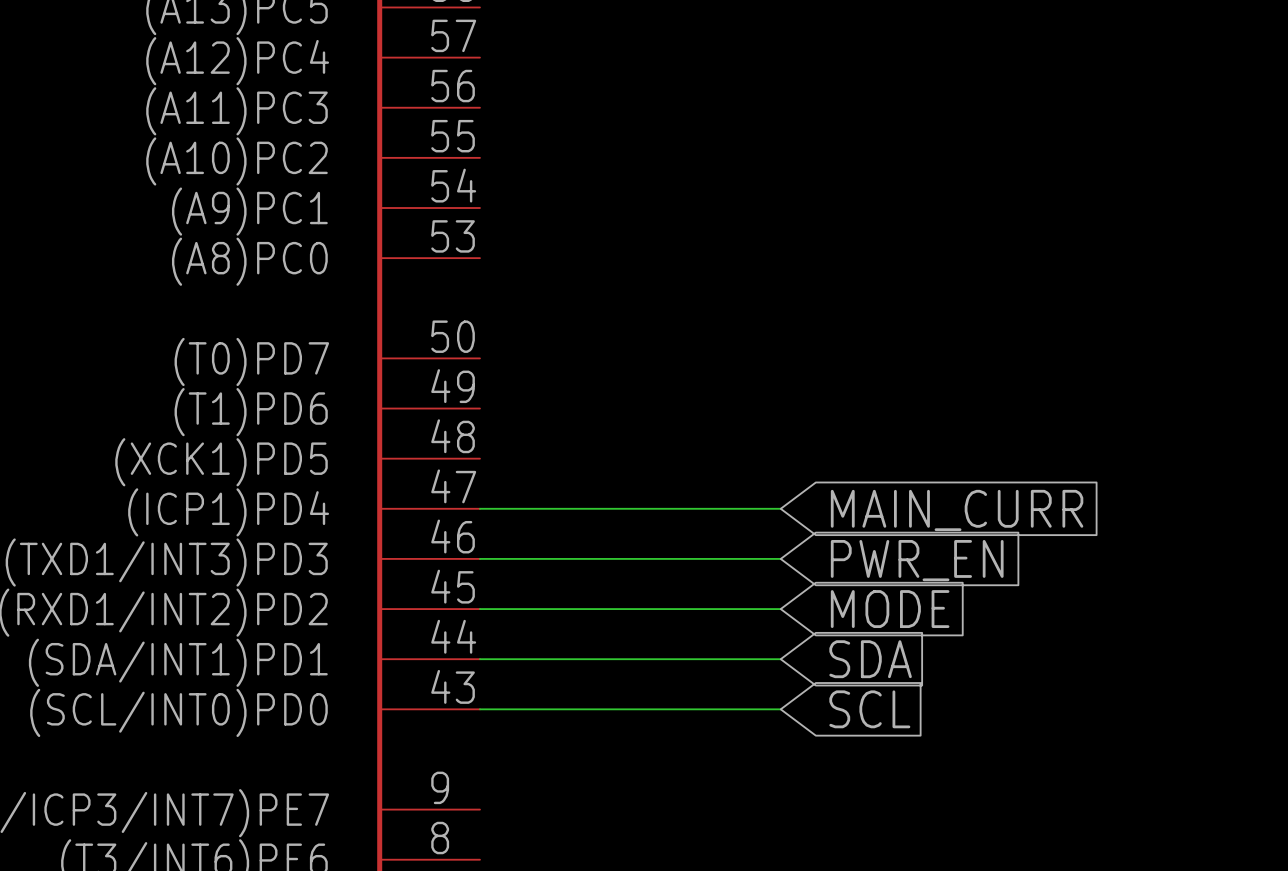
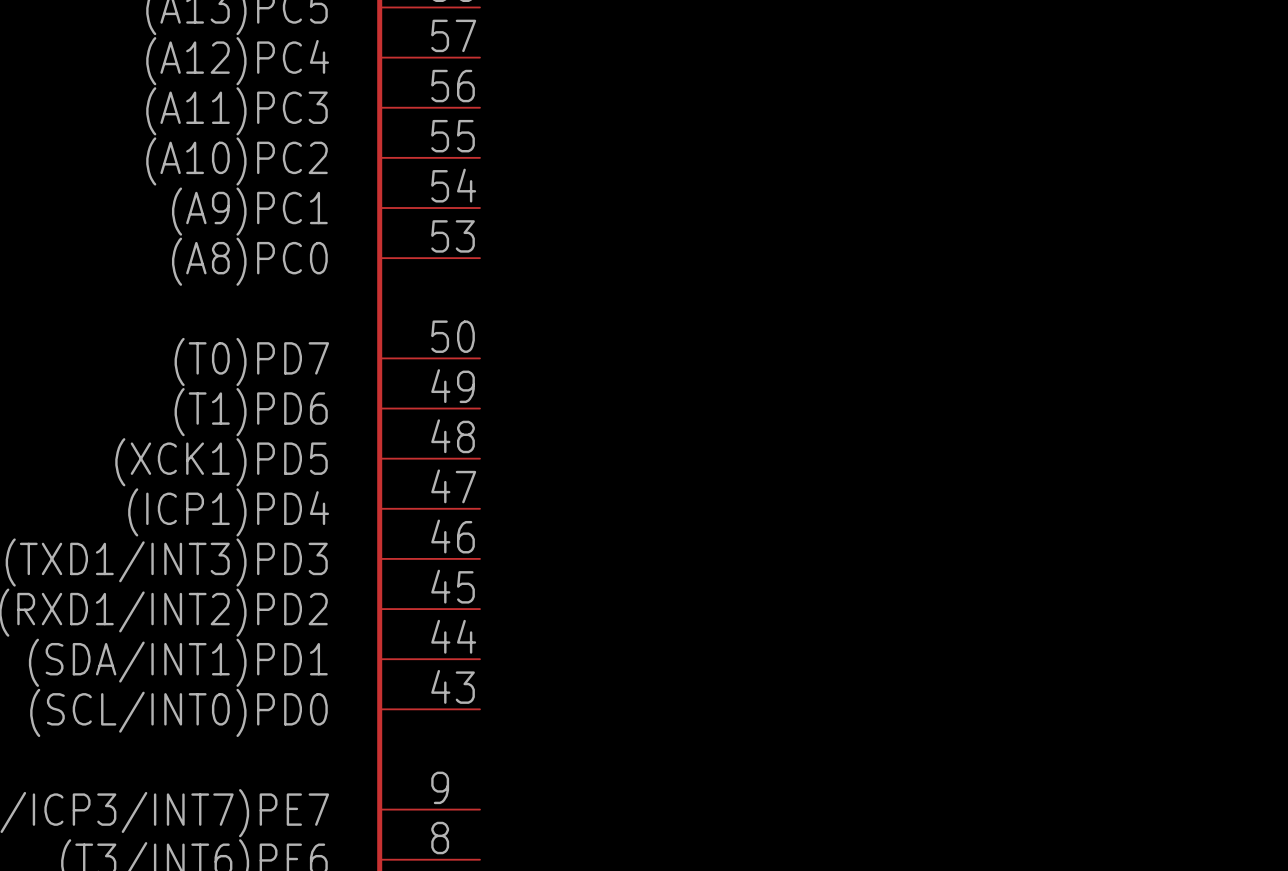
wire: (479, 508) (780, 508) -> none
global label: MAIN_CURR (957, 510) -> none
wire: (479, 558) (780, 558) -> none
global label: PWR_EN (917, 560) -> none
wire: (479, 609) (780, 609) -> none
global label: MODE (890, 609) -> none
wire: (479, 659) (780, 659) -> none
global label: SDA (870, 659) -> none
wire: (479, 709) (780, 709) -> none
global label: SCL (869, 709) -> none

